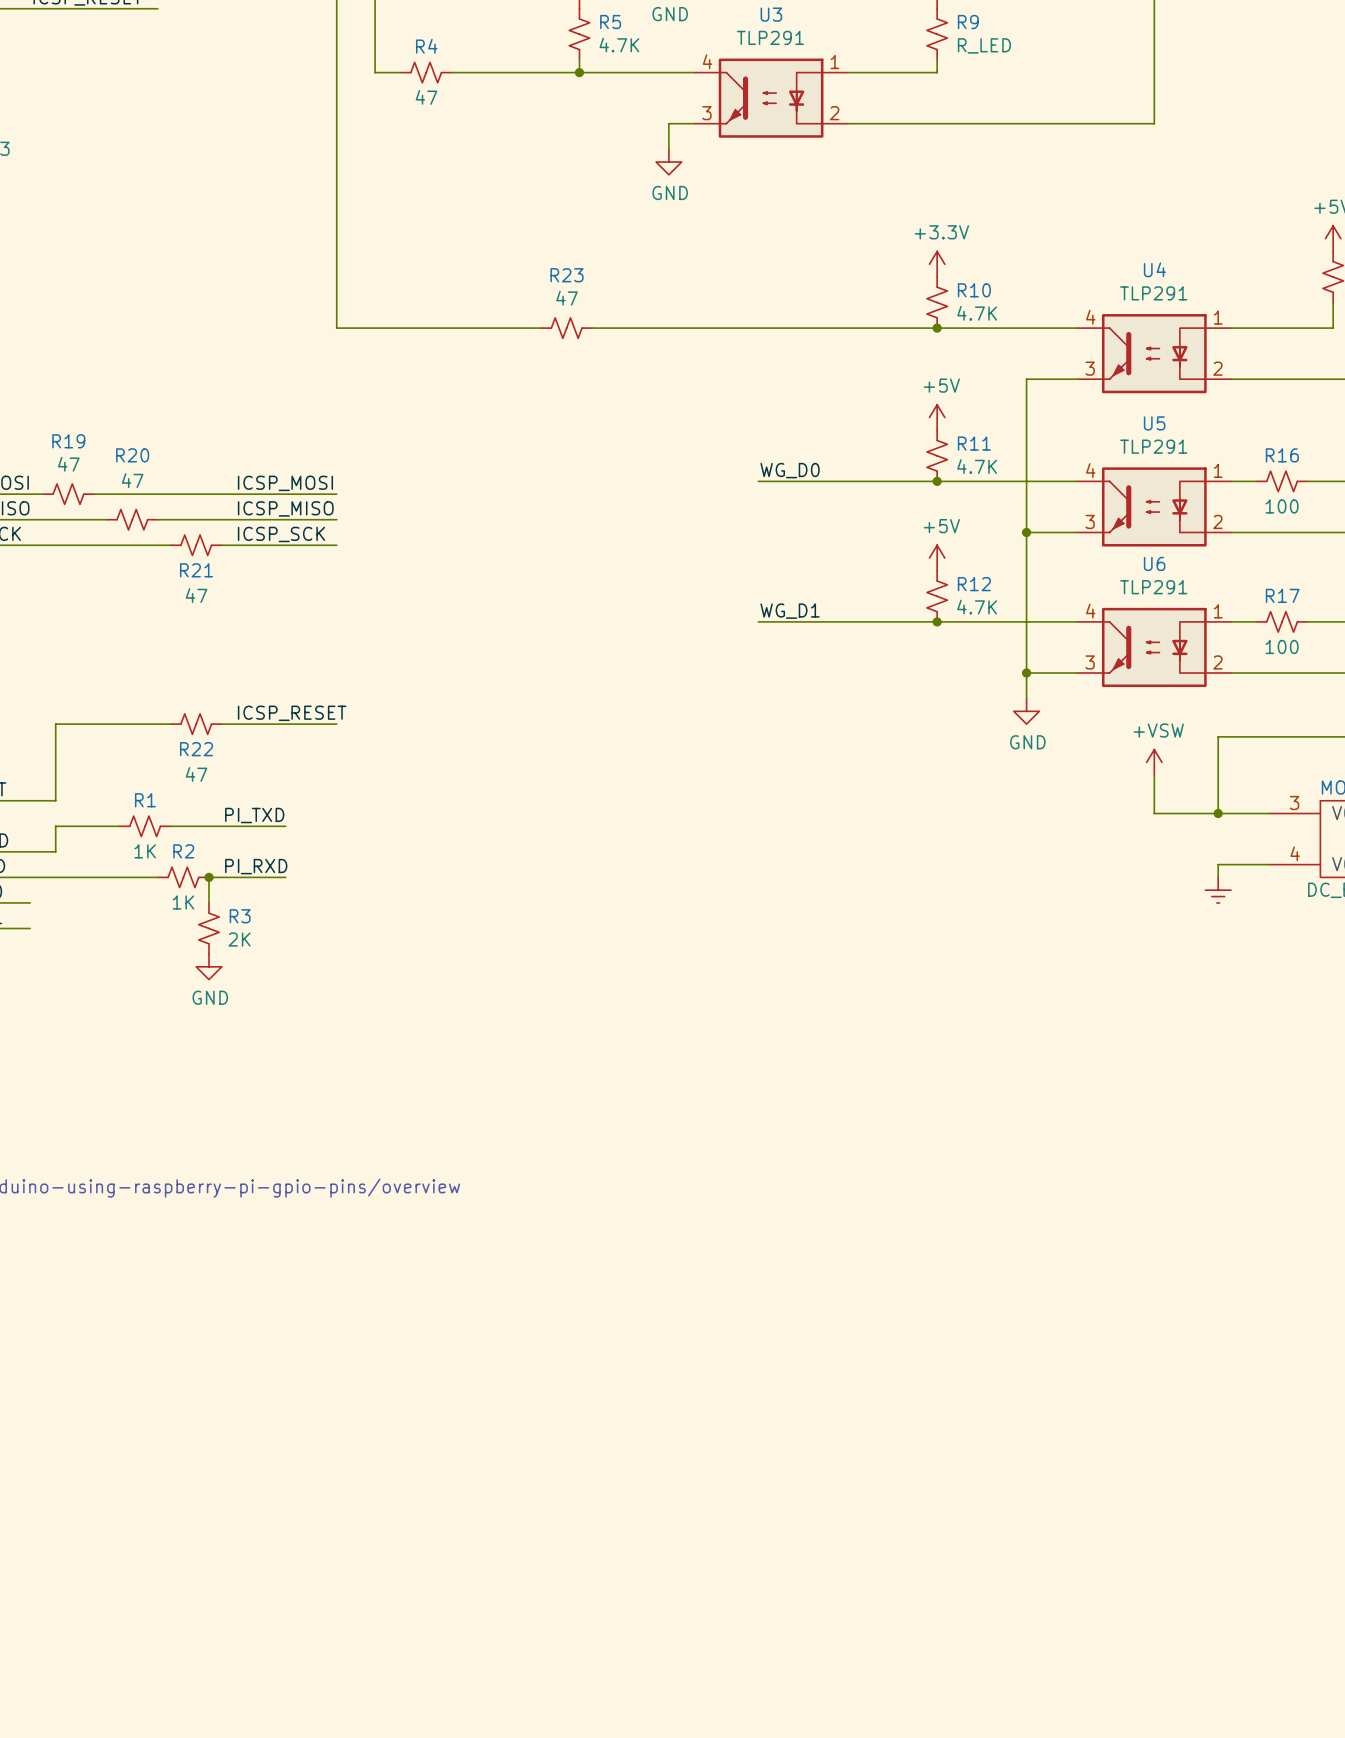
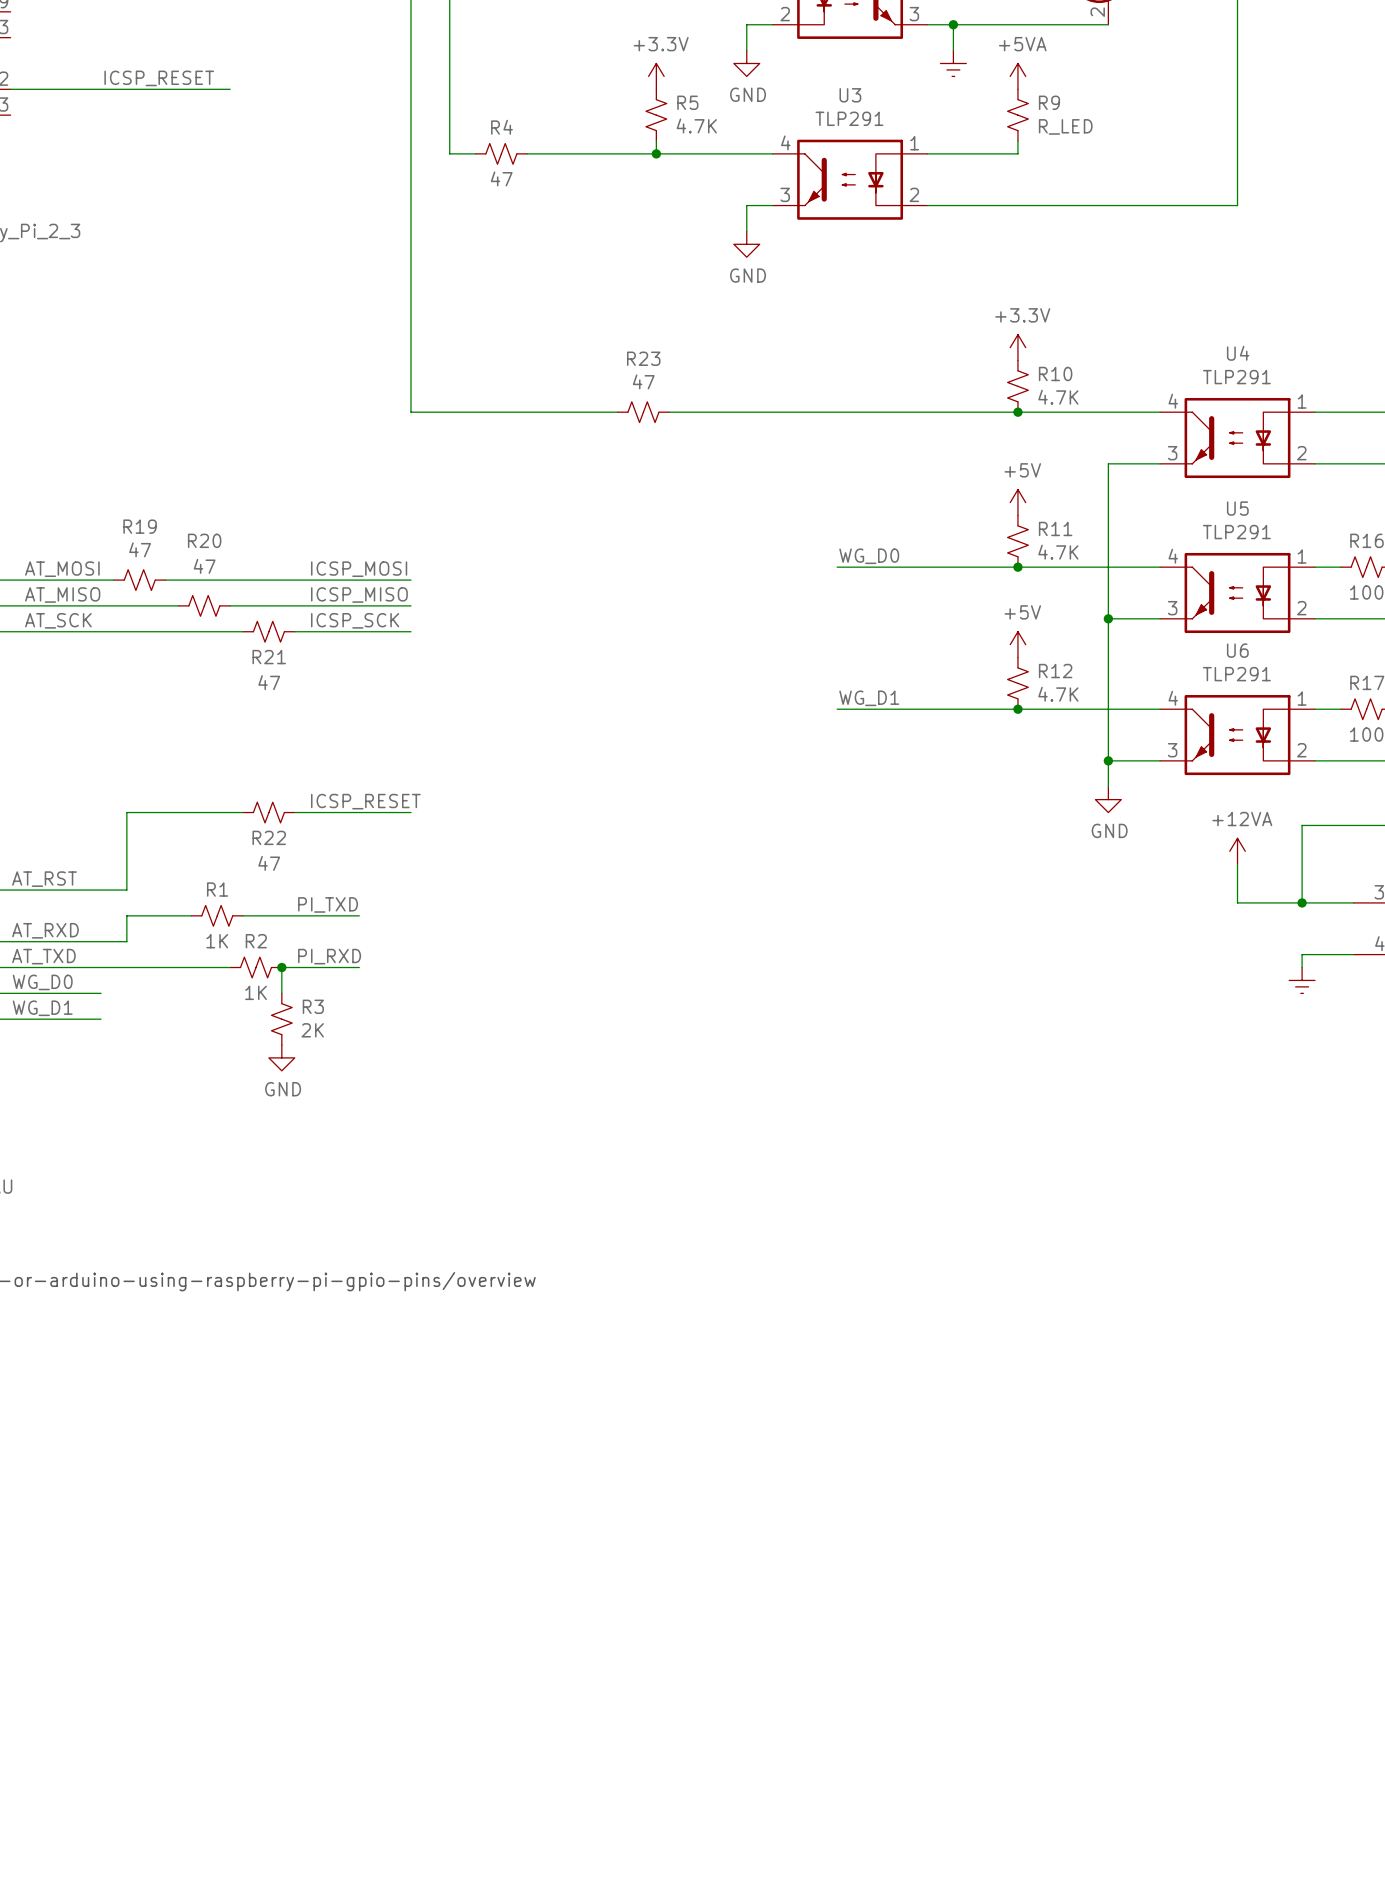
power symbol: +VSW (1154, 762) -> +12VA (1237, 851)

